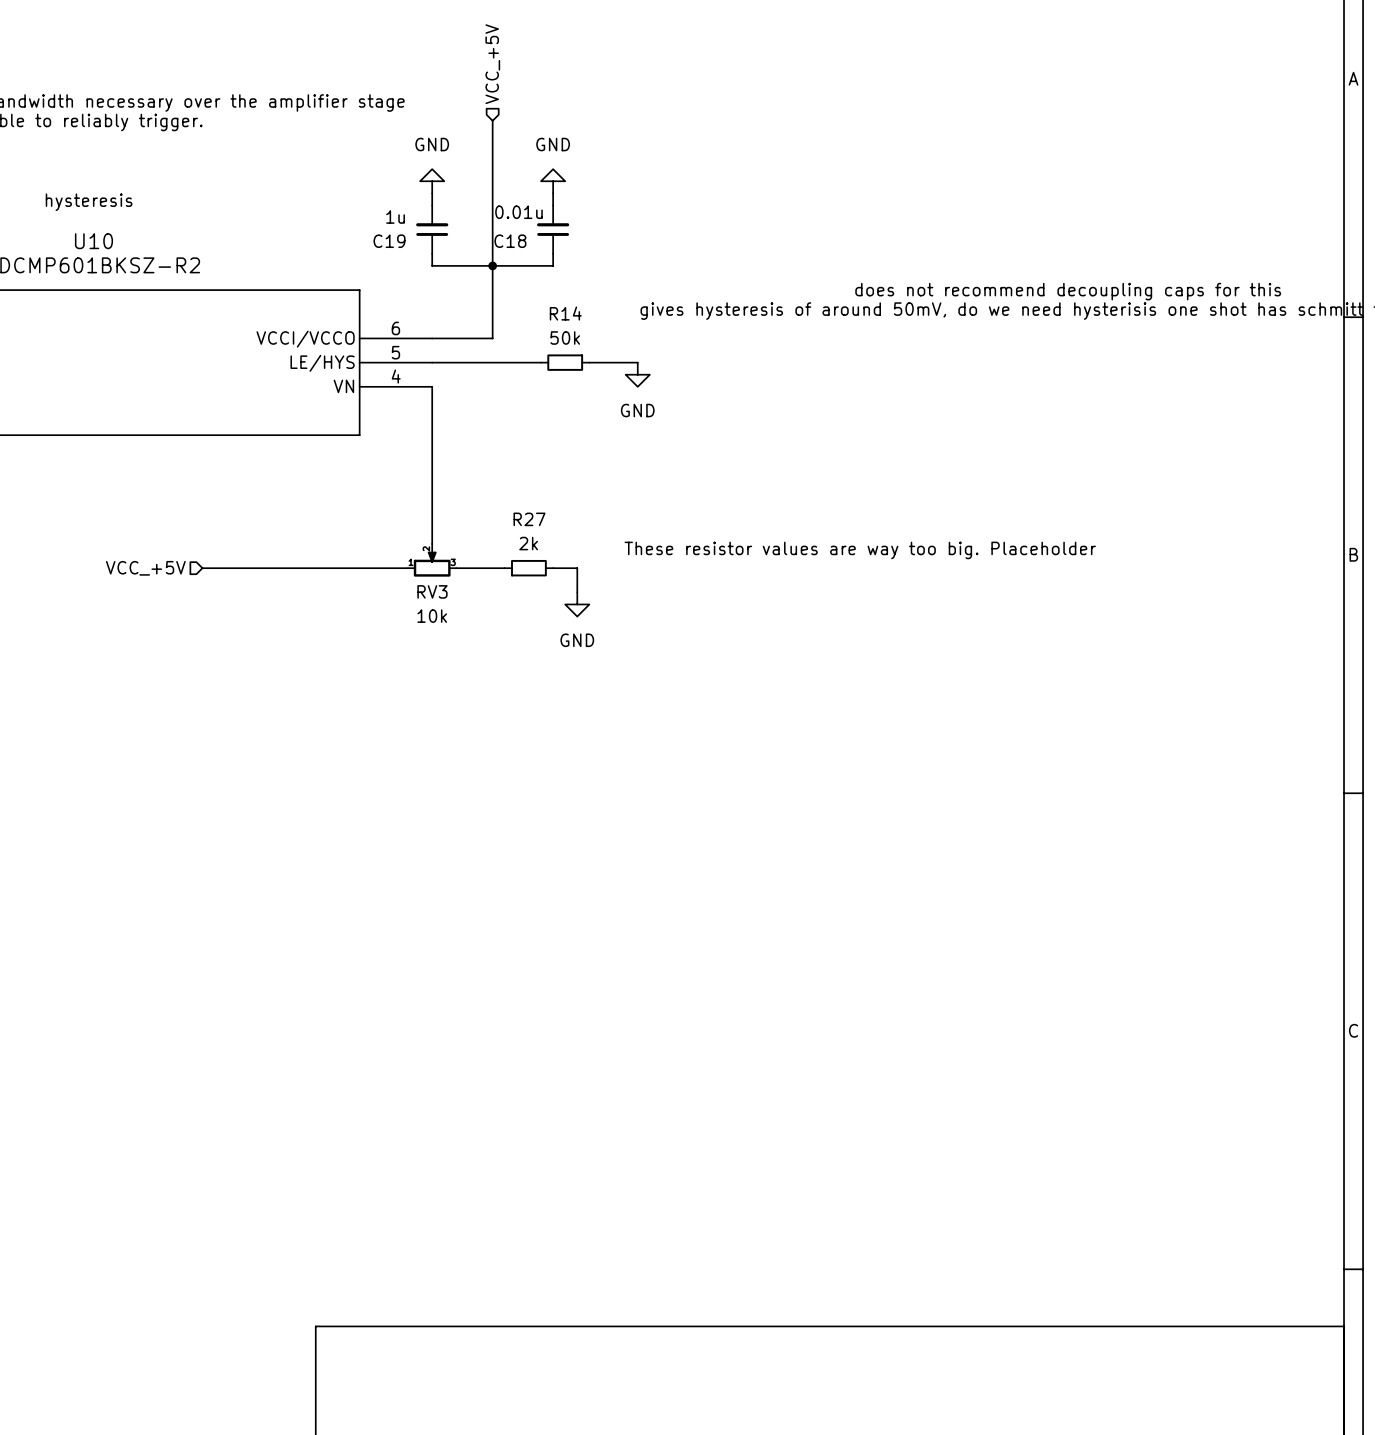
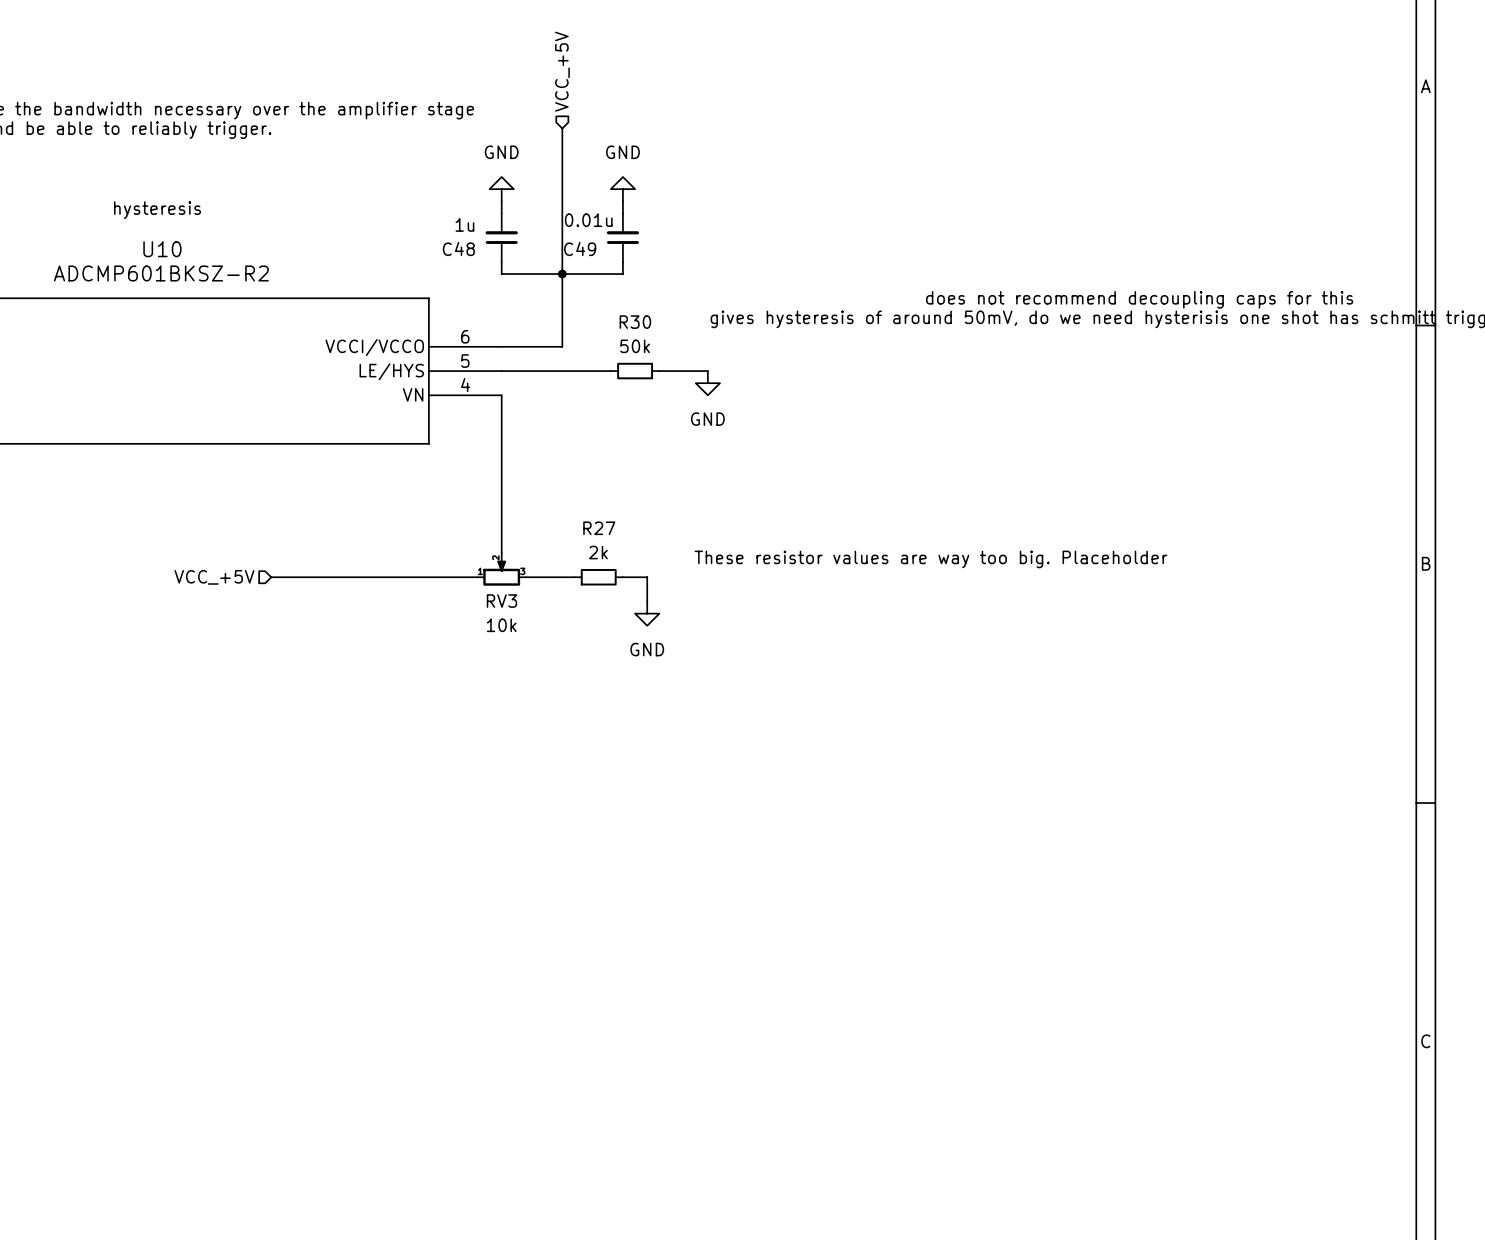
C19 name: C19 (389, 241) -> C48 (458, 248)
C18 name: C18 (510, 241) -> C49 (580, 248)
R14 name: R14 (565, 313) -> R30 (635, 322)

